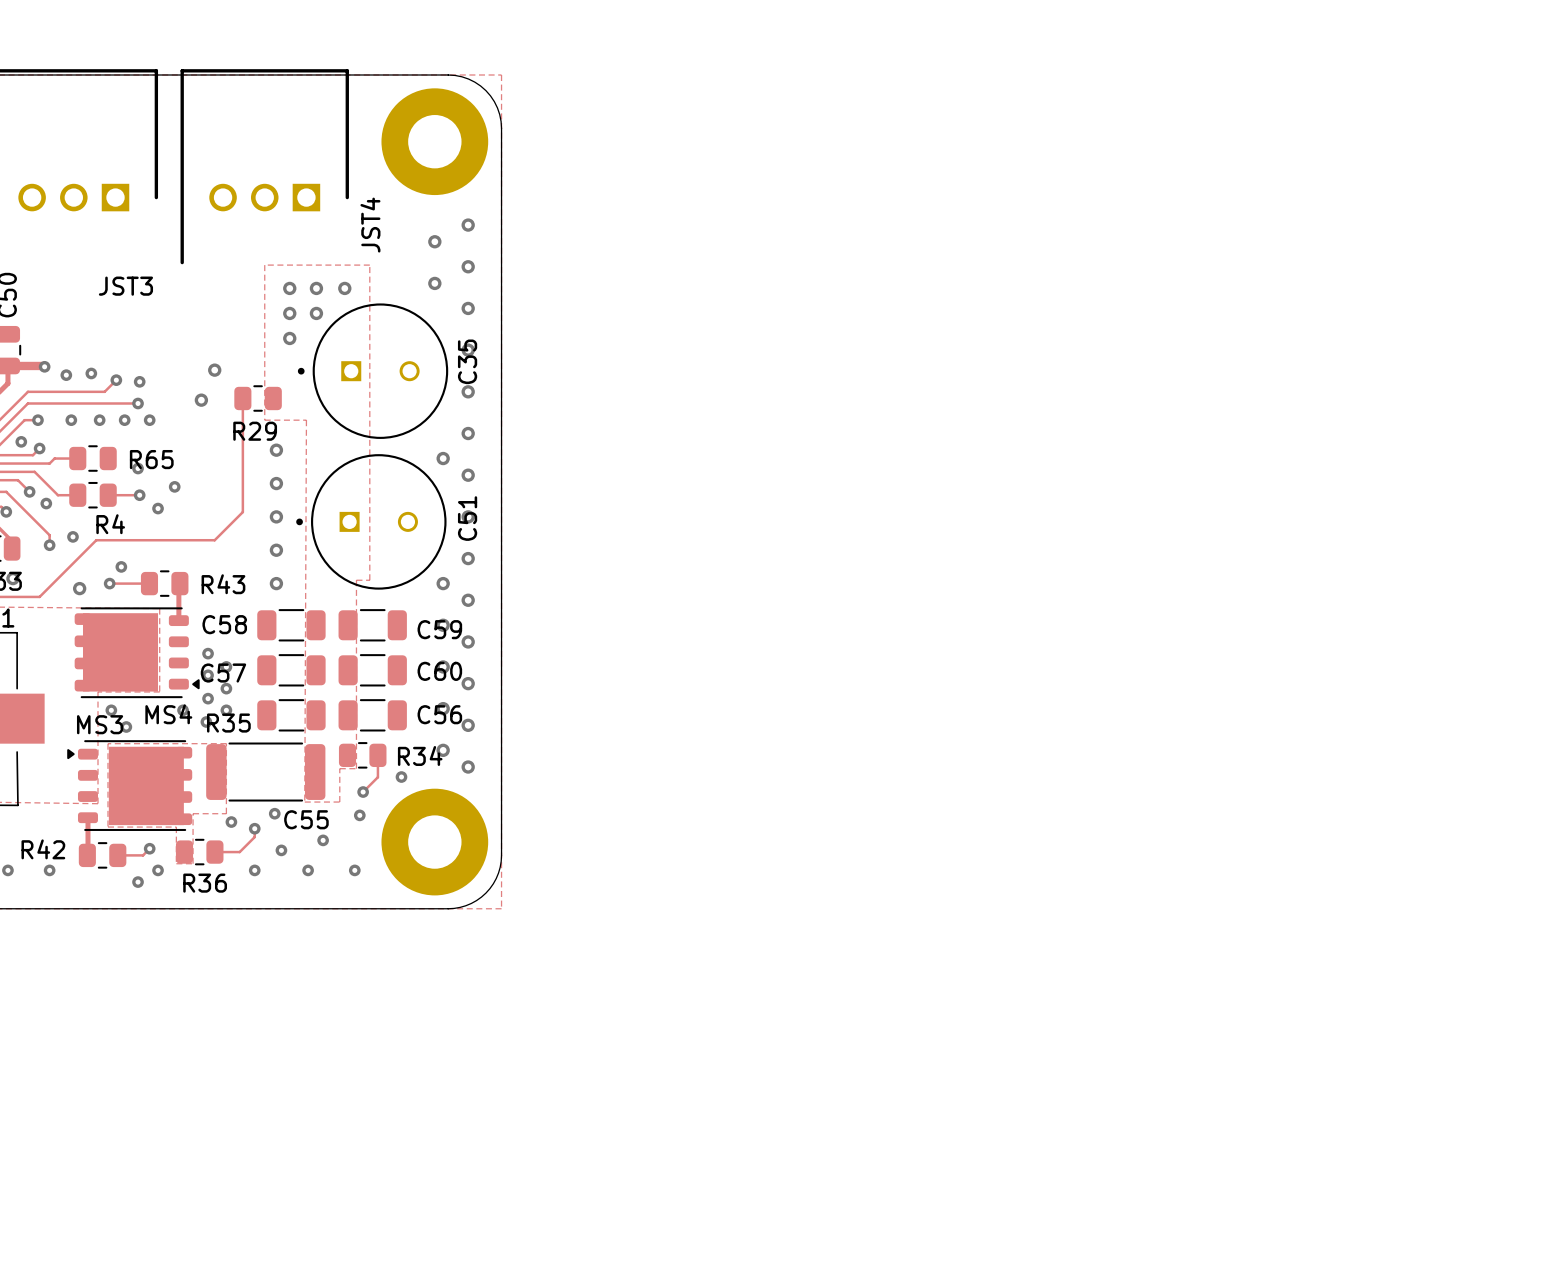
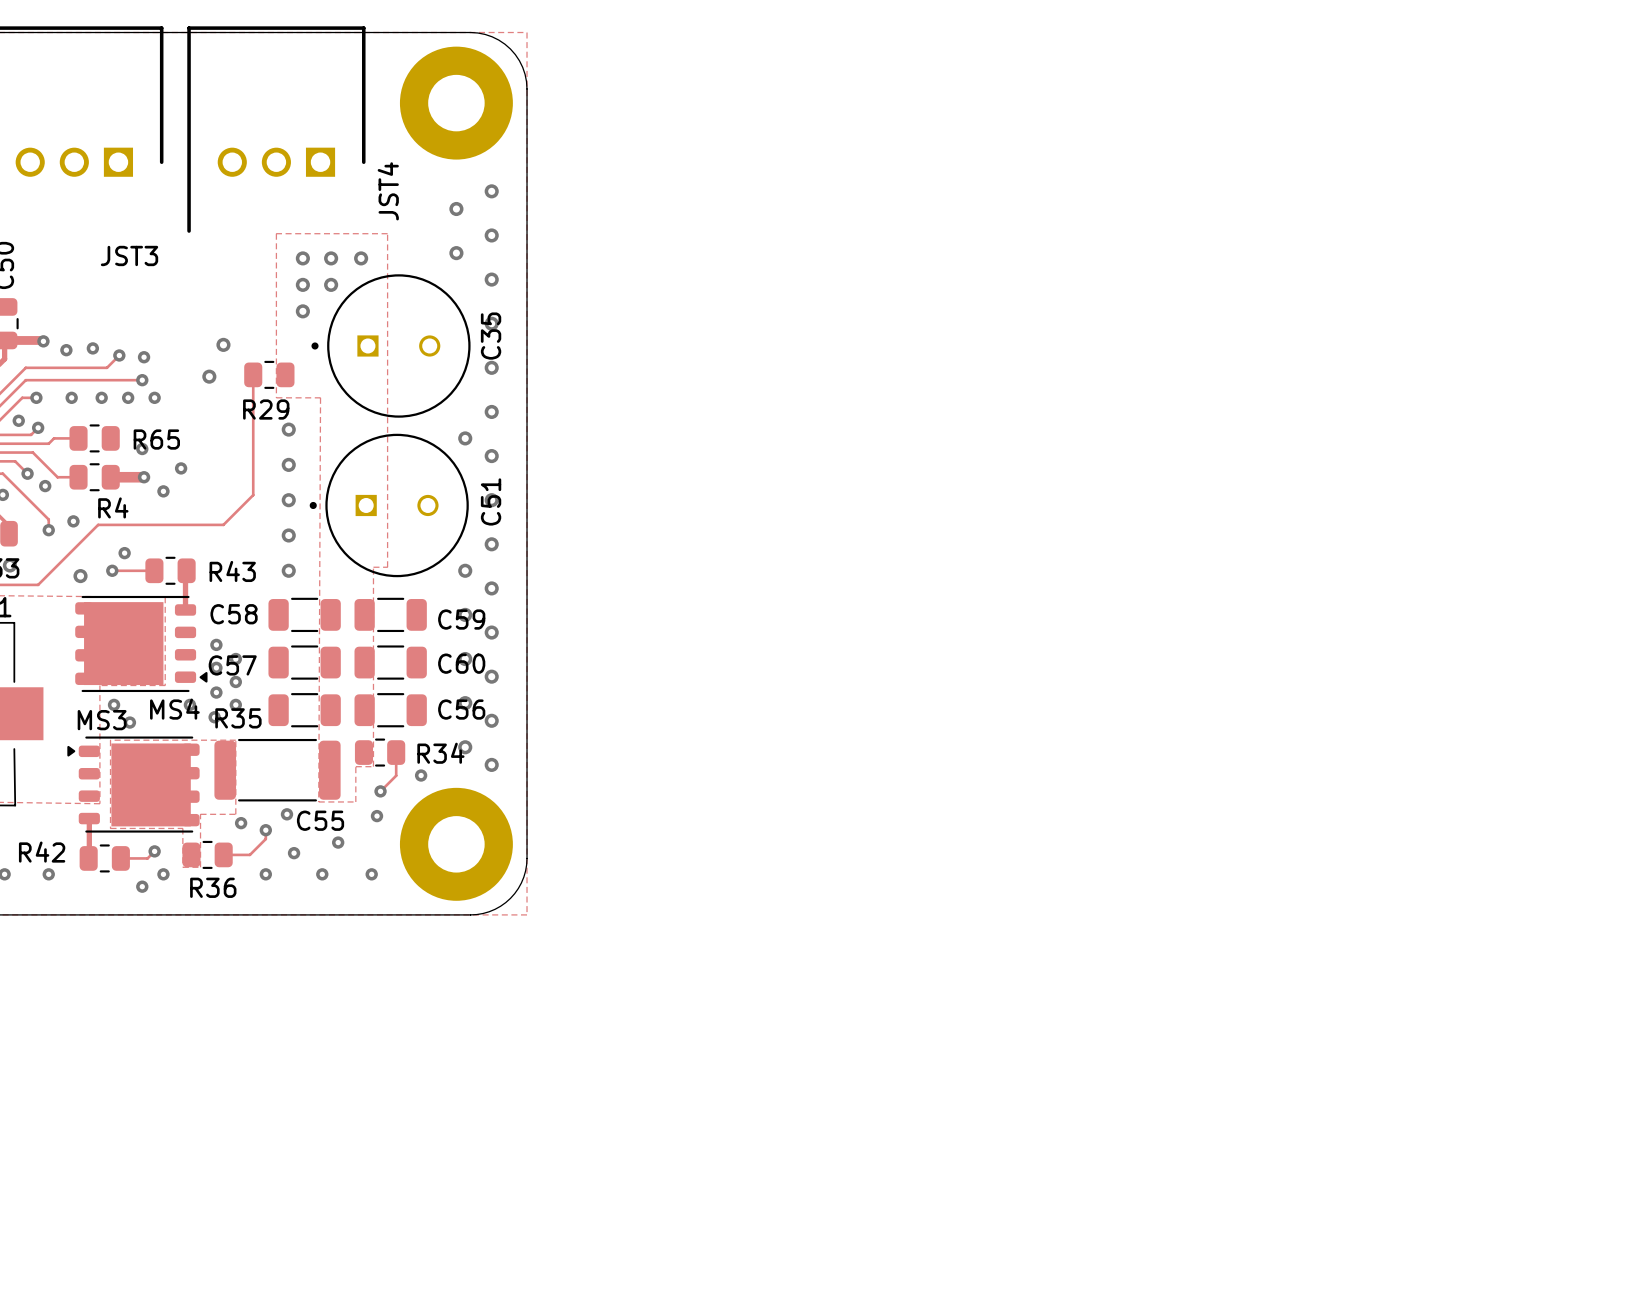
track width: thin (108, 495) (139, 495) -> thick (110, 477) (144, 477)

